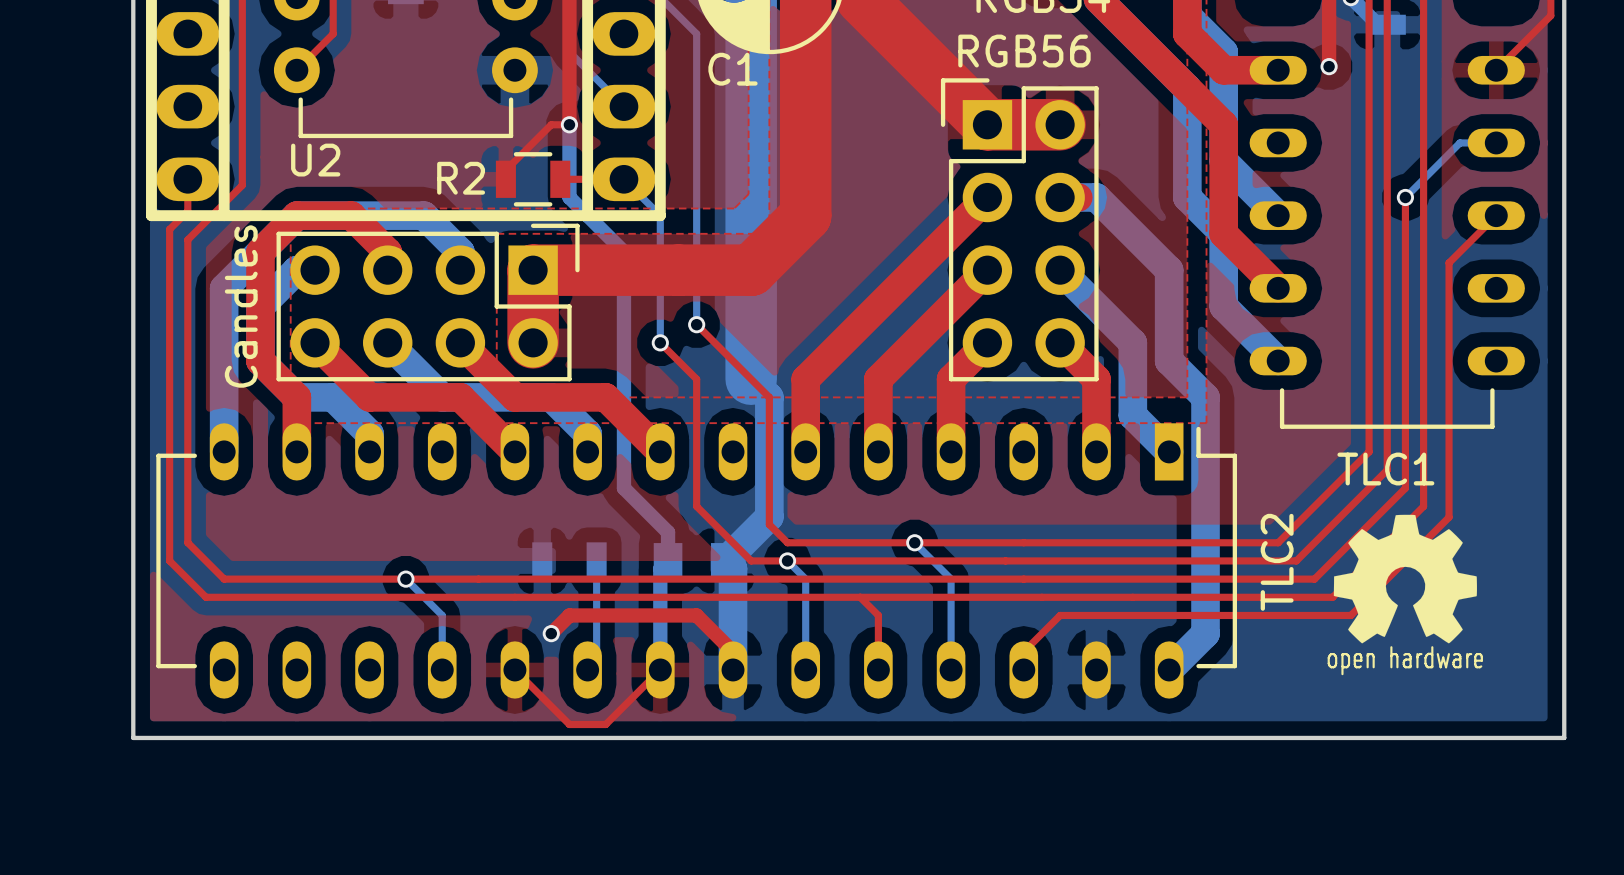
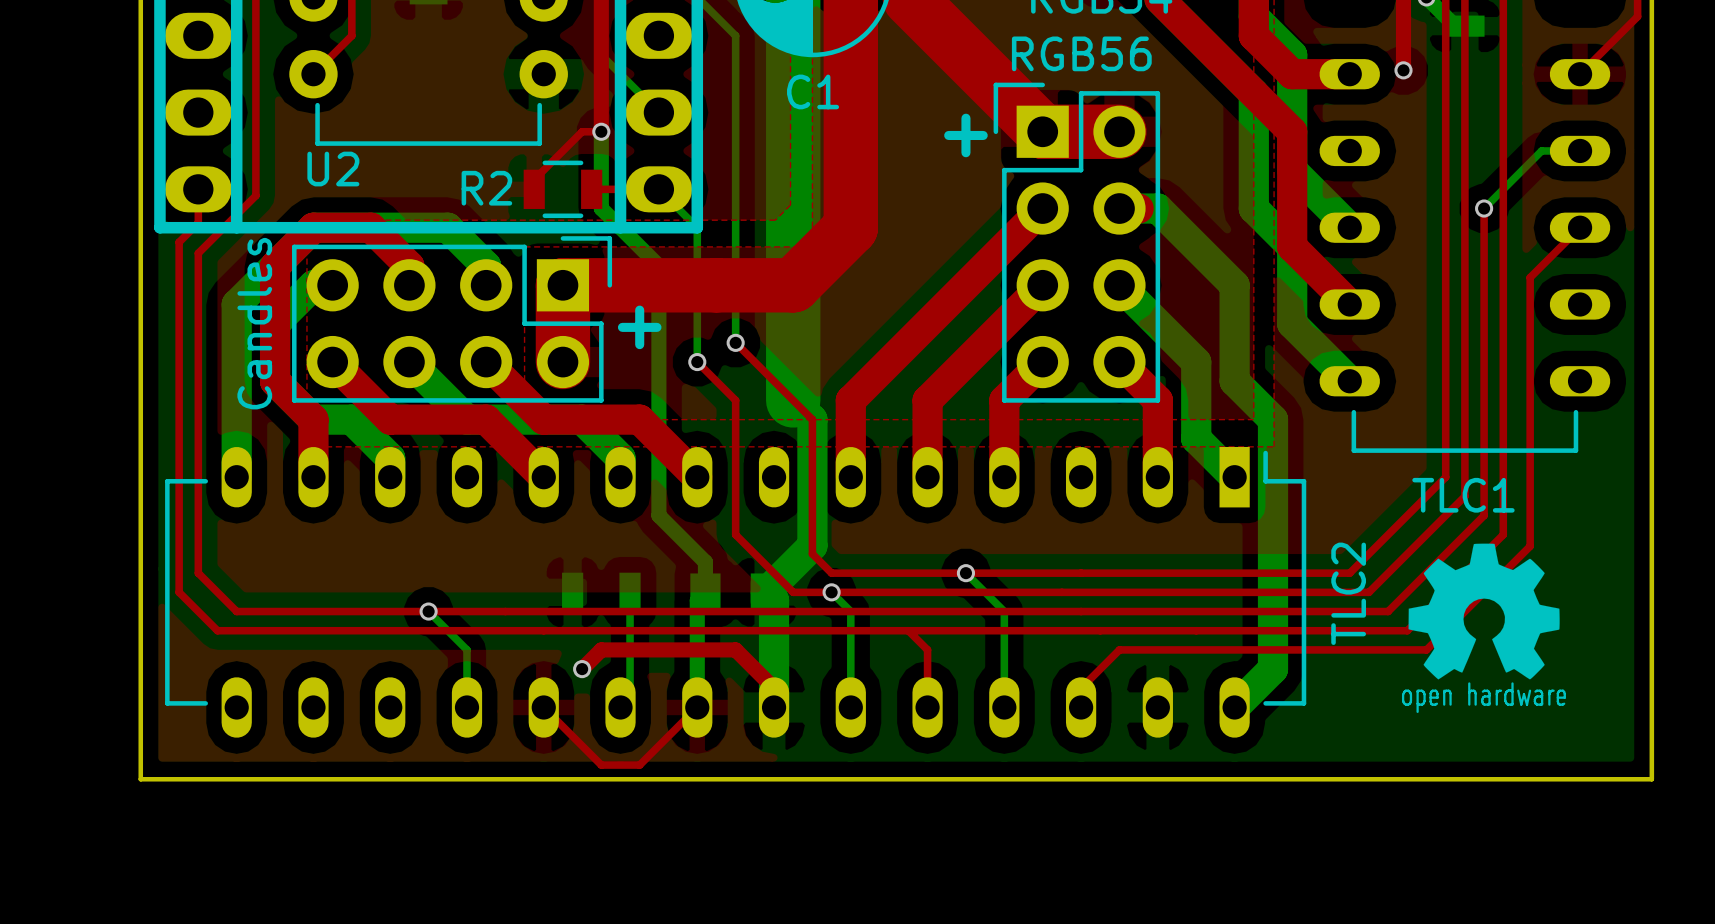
C1 name position: C1 (733, 69) -> C1 (813, 91)
text: none -> + (965, 135)
text: none -> + (639, 327)

